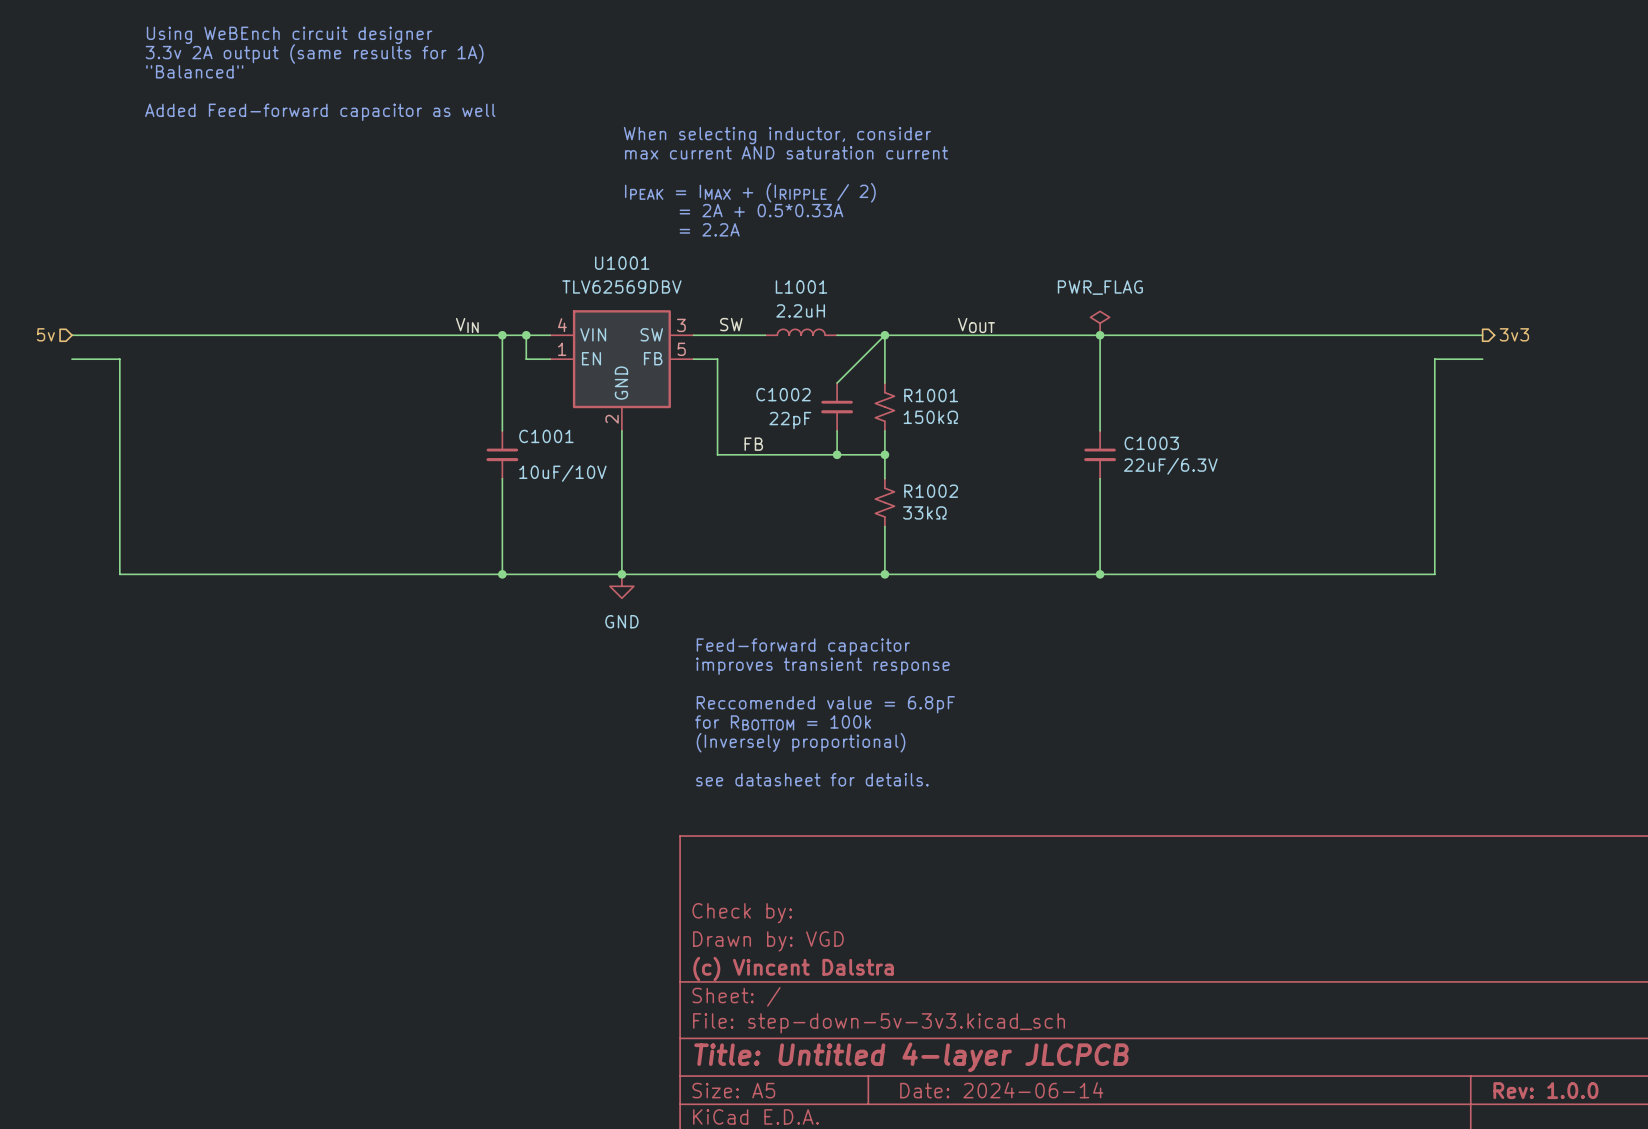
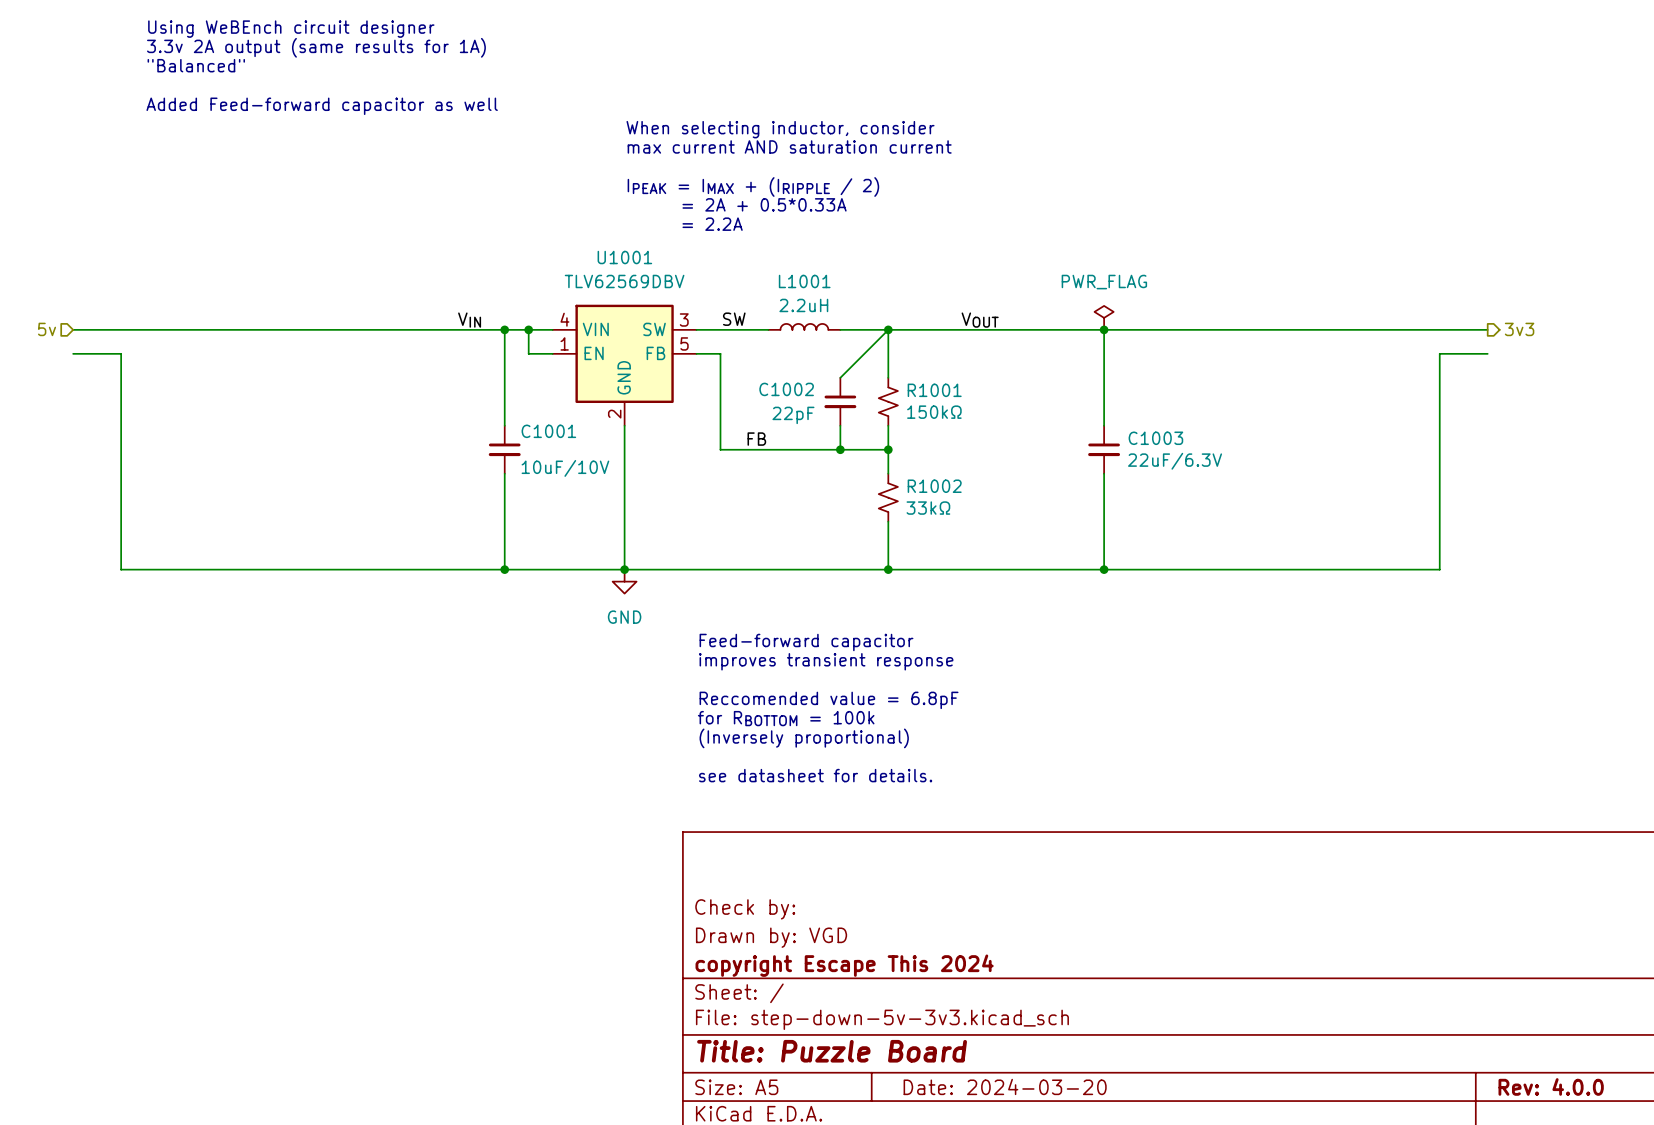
title block: (c) Vincent Dalstra (793, 968) -> copyright Escape This 2024 (844, 965)
title block: Title: Untitled 4-layer JLCPCB (911, 1057) -> Title: Puzzle Board (832, 1051)
title block: Date: 2024-06-14 (1001, 1090) -> Date: 2024-03-20 (1005, 1086)
title block: Rev: 1.0.0 (1545, 1090) -> Rev: 4.0.0 (1551, 1086)

